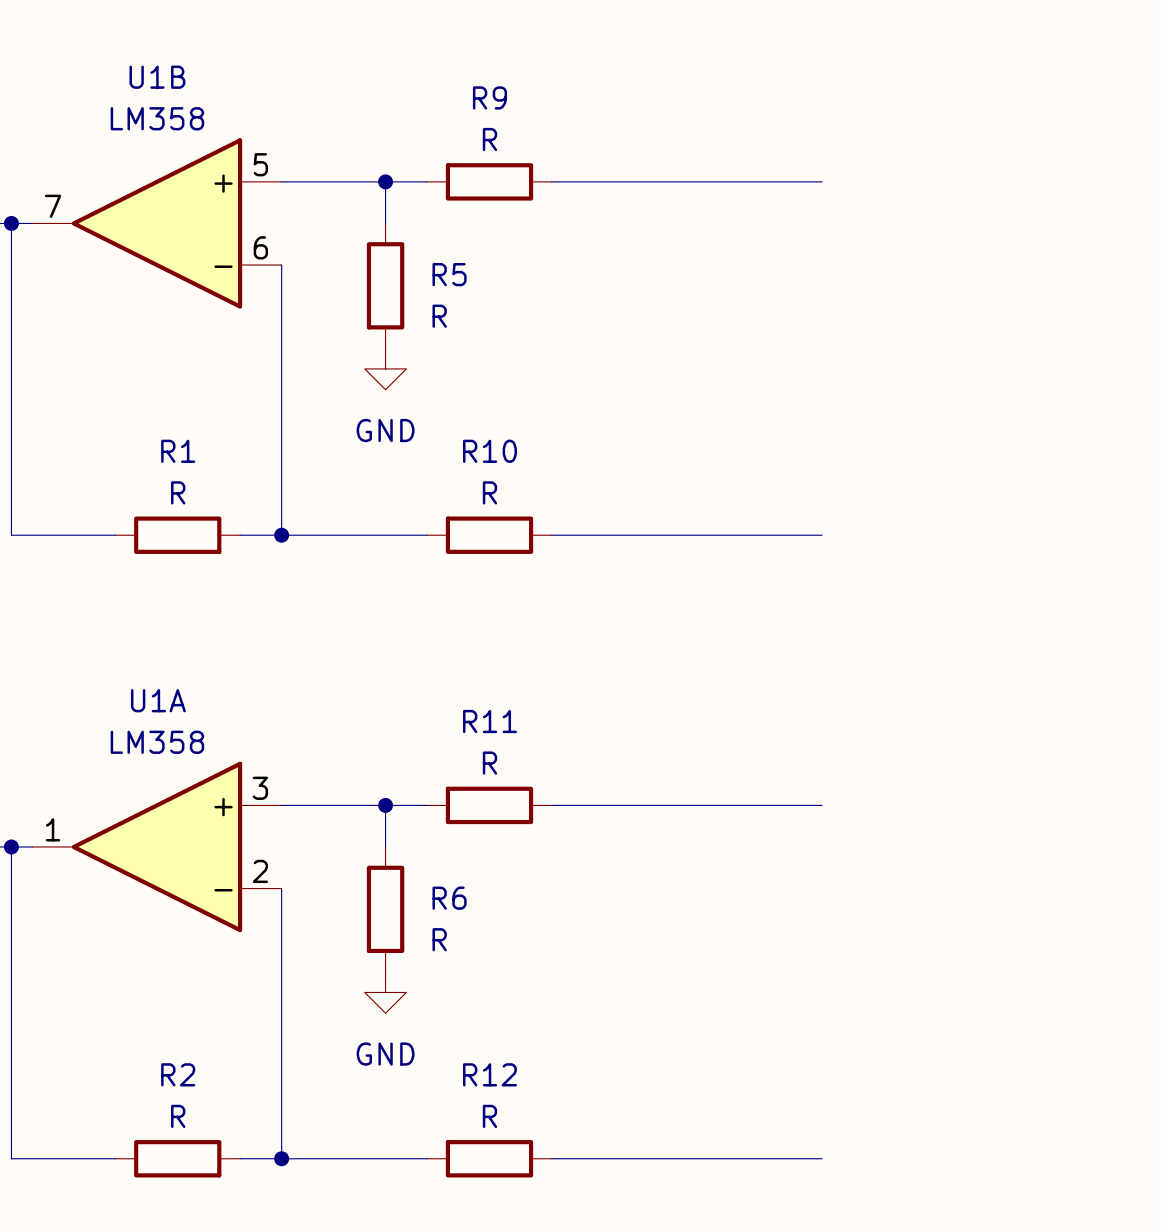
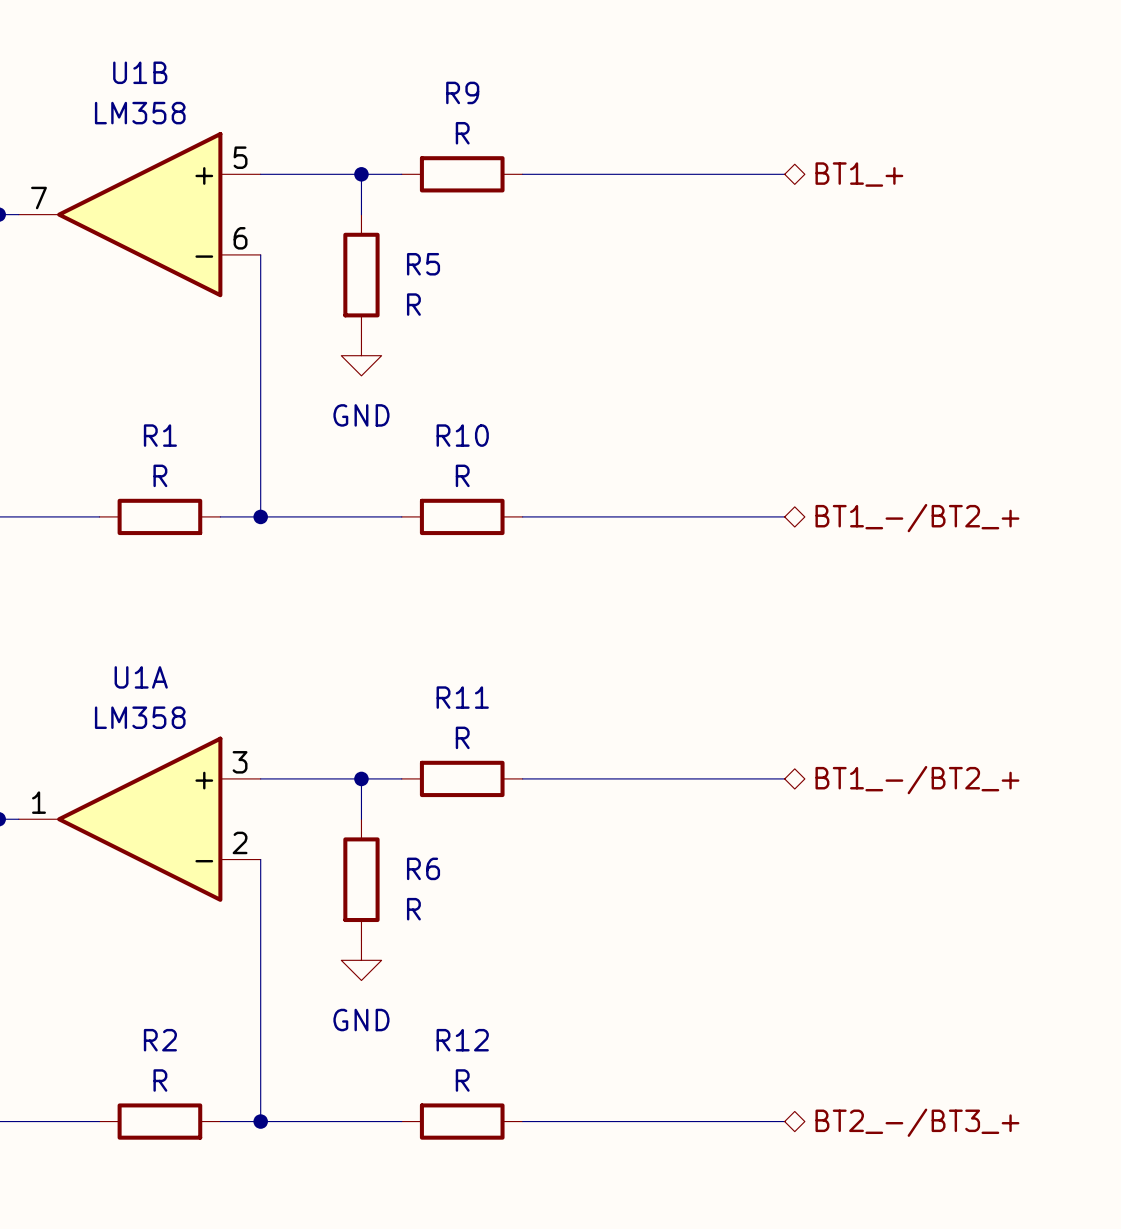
hierarchical label: none -> BT1_+ (859, 174)
hierarchical label: none -> BT1_-/BT2_+ (917, 518)
hierarchical label: none -> BT1_-/BT2_+ (917, 780)
hierarchical label: none -> BT2_-/BT3_+ (917, 1122)

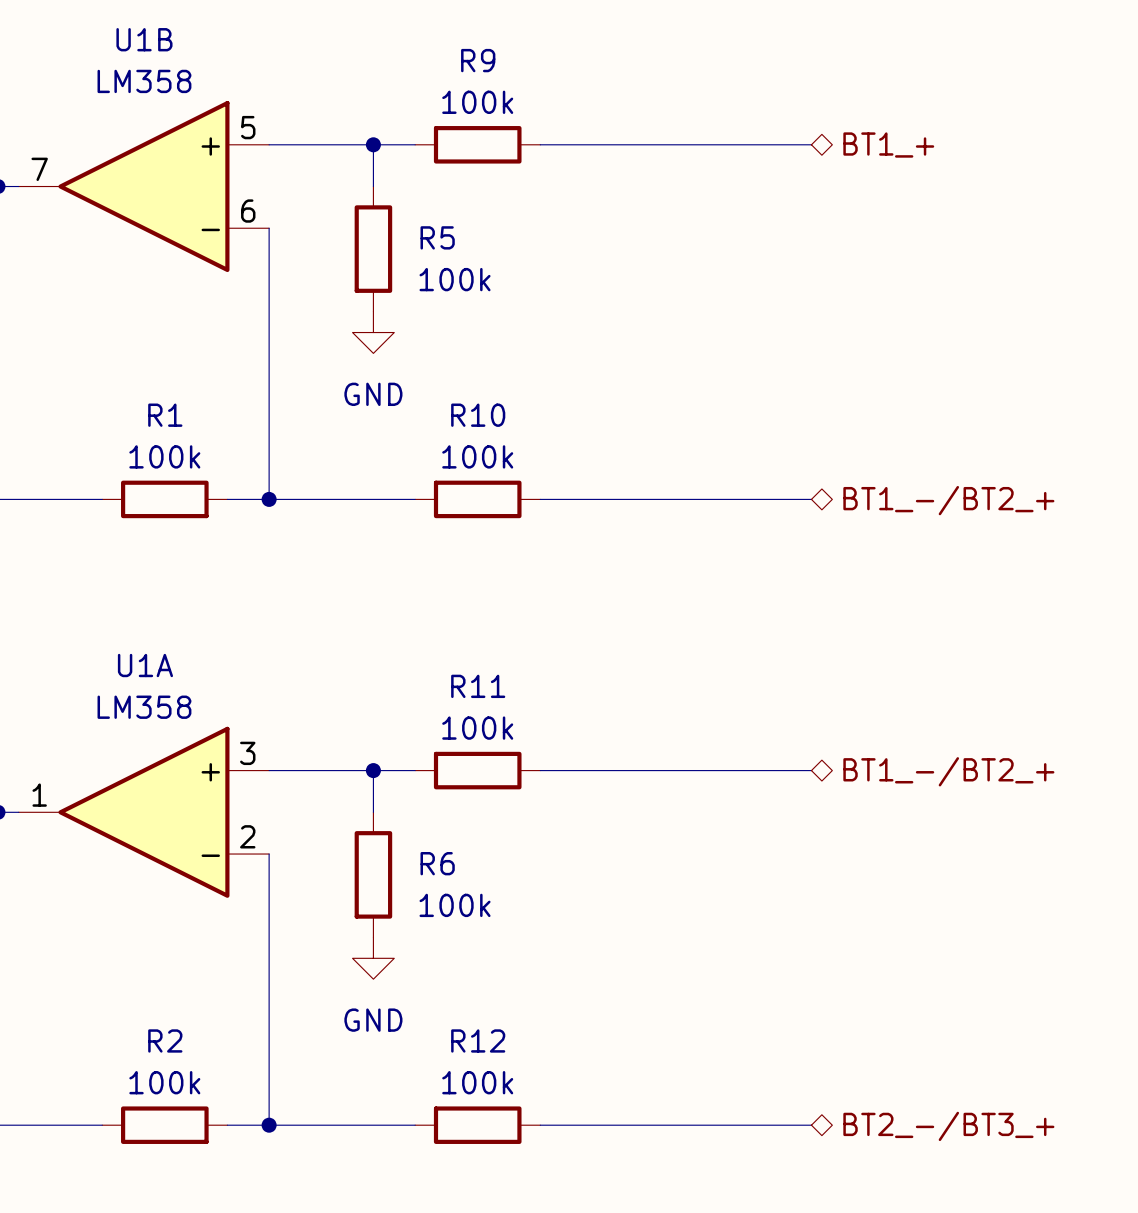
R9 value: R (462, 133) -> 100k (477, 102)
R5 value: R (413, 304) -> 100k (455, 279)
R1 value: R (160, 475) -> 100k (164, 456)
R10 value: R (462, 475) -> 100k (477, 456)
R11 value: R (462, 737) -> 100k (477, 728)
R6 value: R (413, 909) -> 100k (455, 905)
R2 value: R (160, 1080) -> 100k (164, 1082)
R12 value: R (462, 1080) -> 100k (477, 1082)

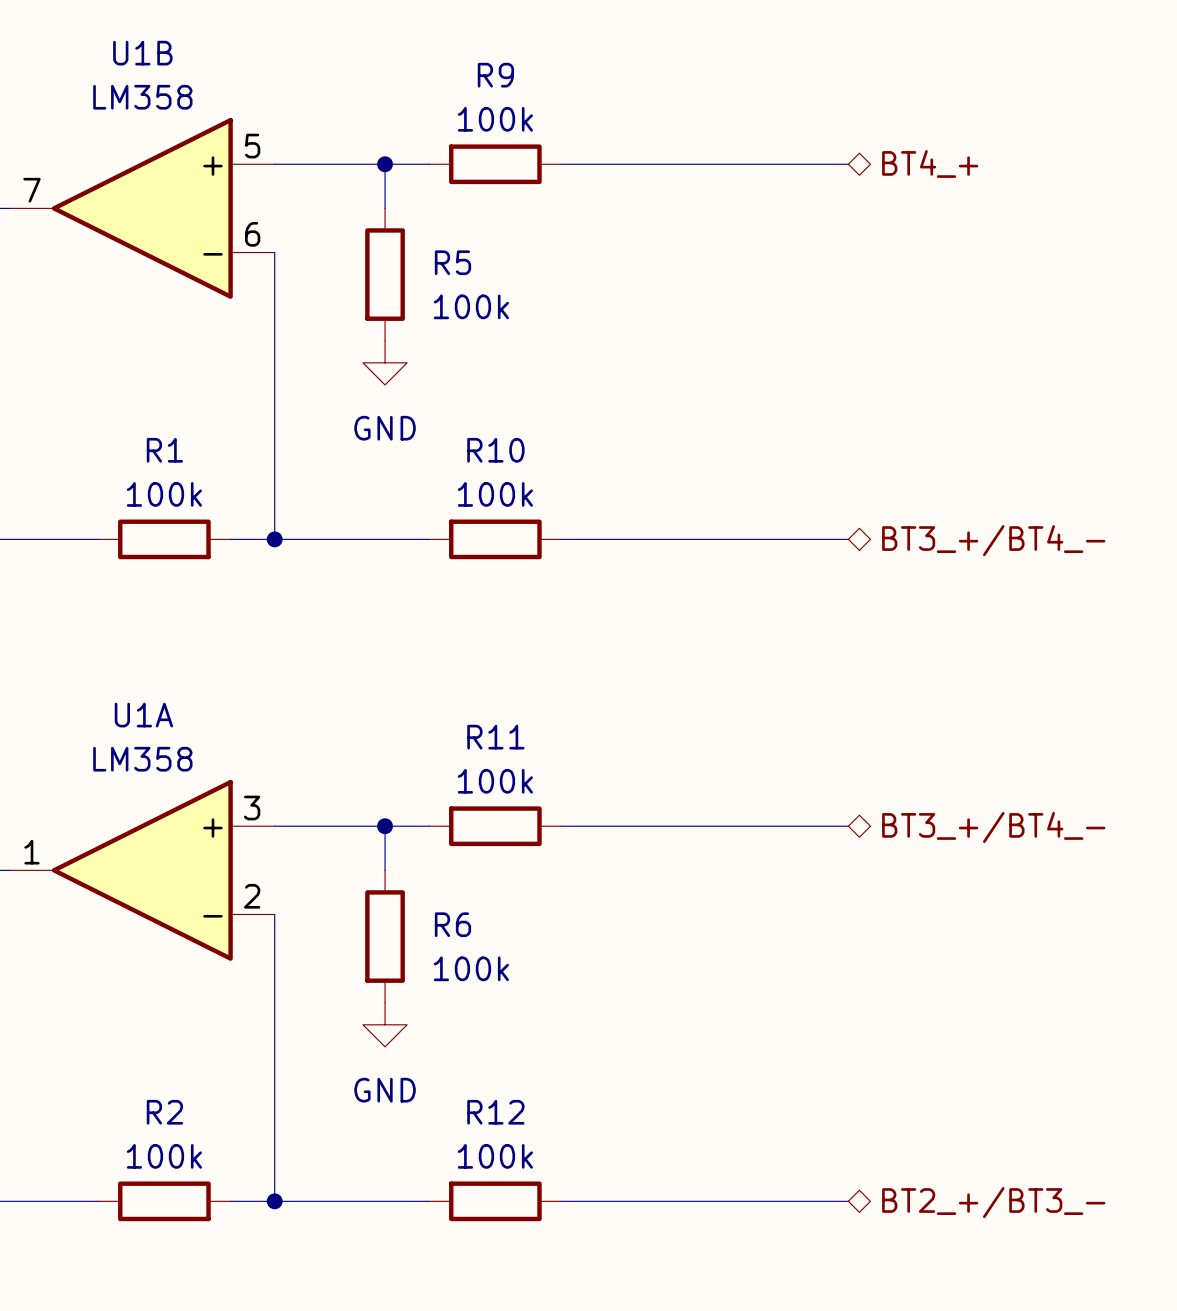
hierarchical label: BT1_+ (888, 145) -> BT4_+ (930, 163)
hierarchical label: BT1_-/BT2_+ (948, 500) -> BT3_+/BT4_- (993, 540)
hierarchical label: BT1_-/BT2_+ (948, 771) -> BT3_+/BT4_- (993, 827)
hierarchical label: BT2_-/BT3_+ (948, 1126) -> BT2_+/BT3_- (993, 1202)

